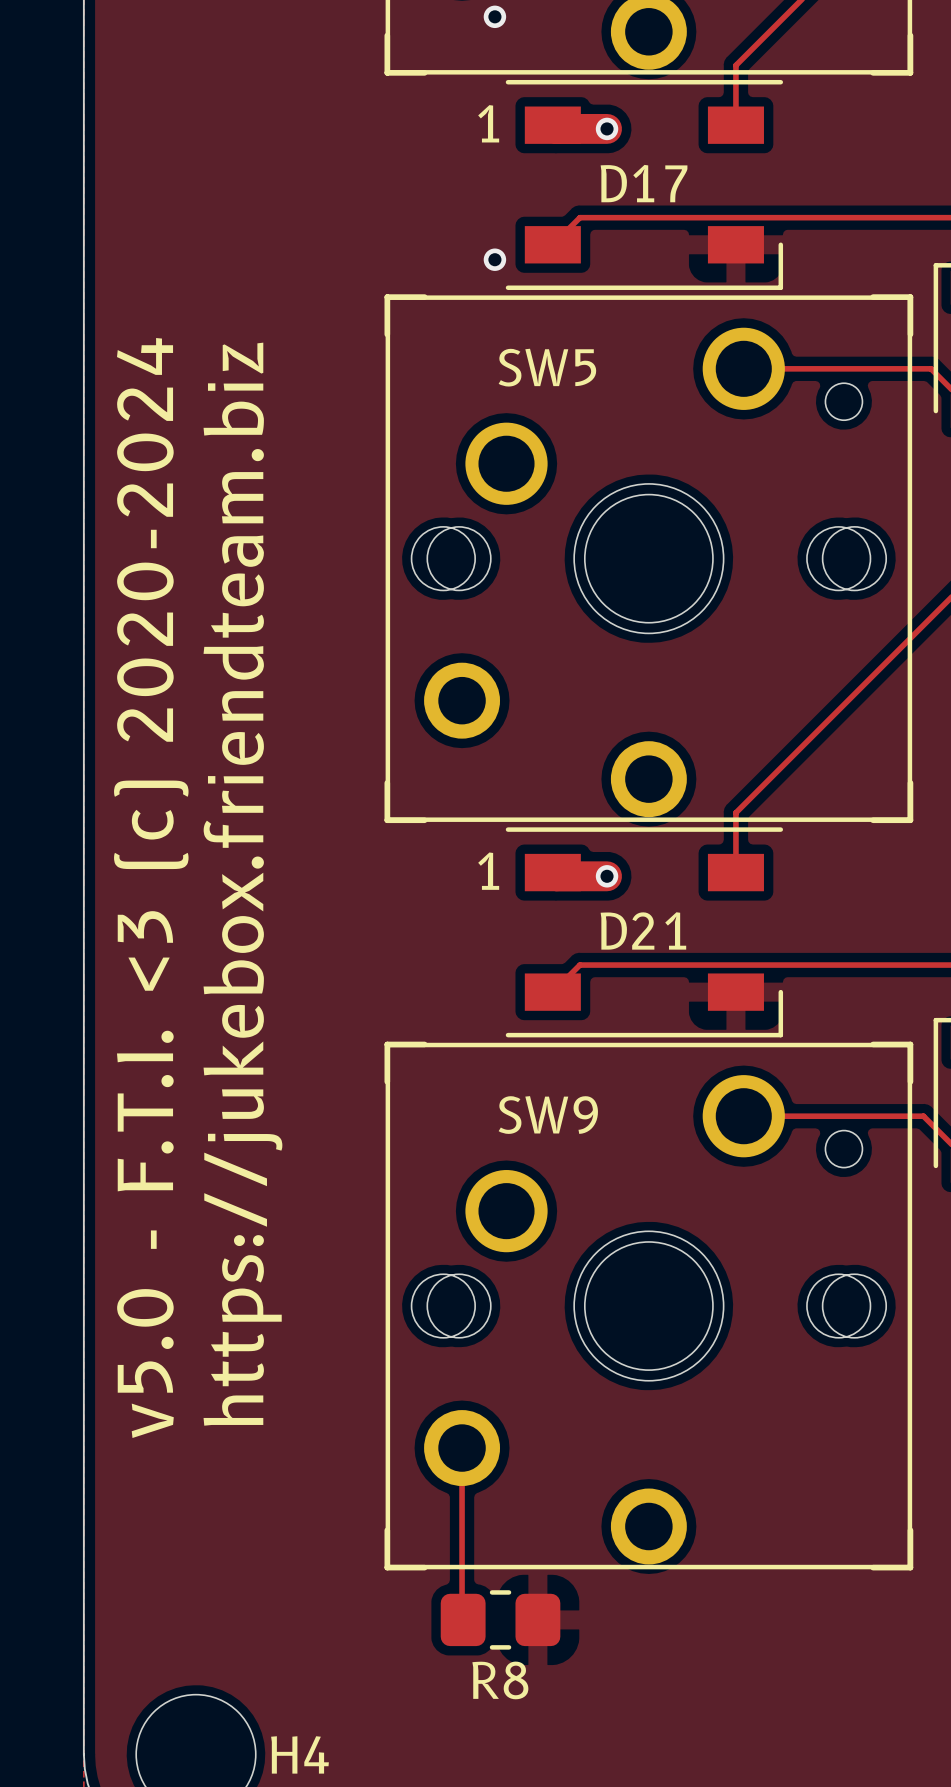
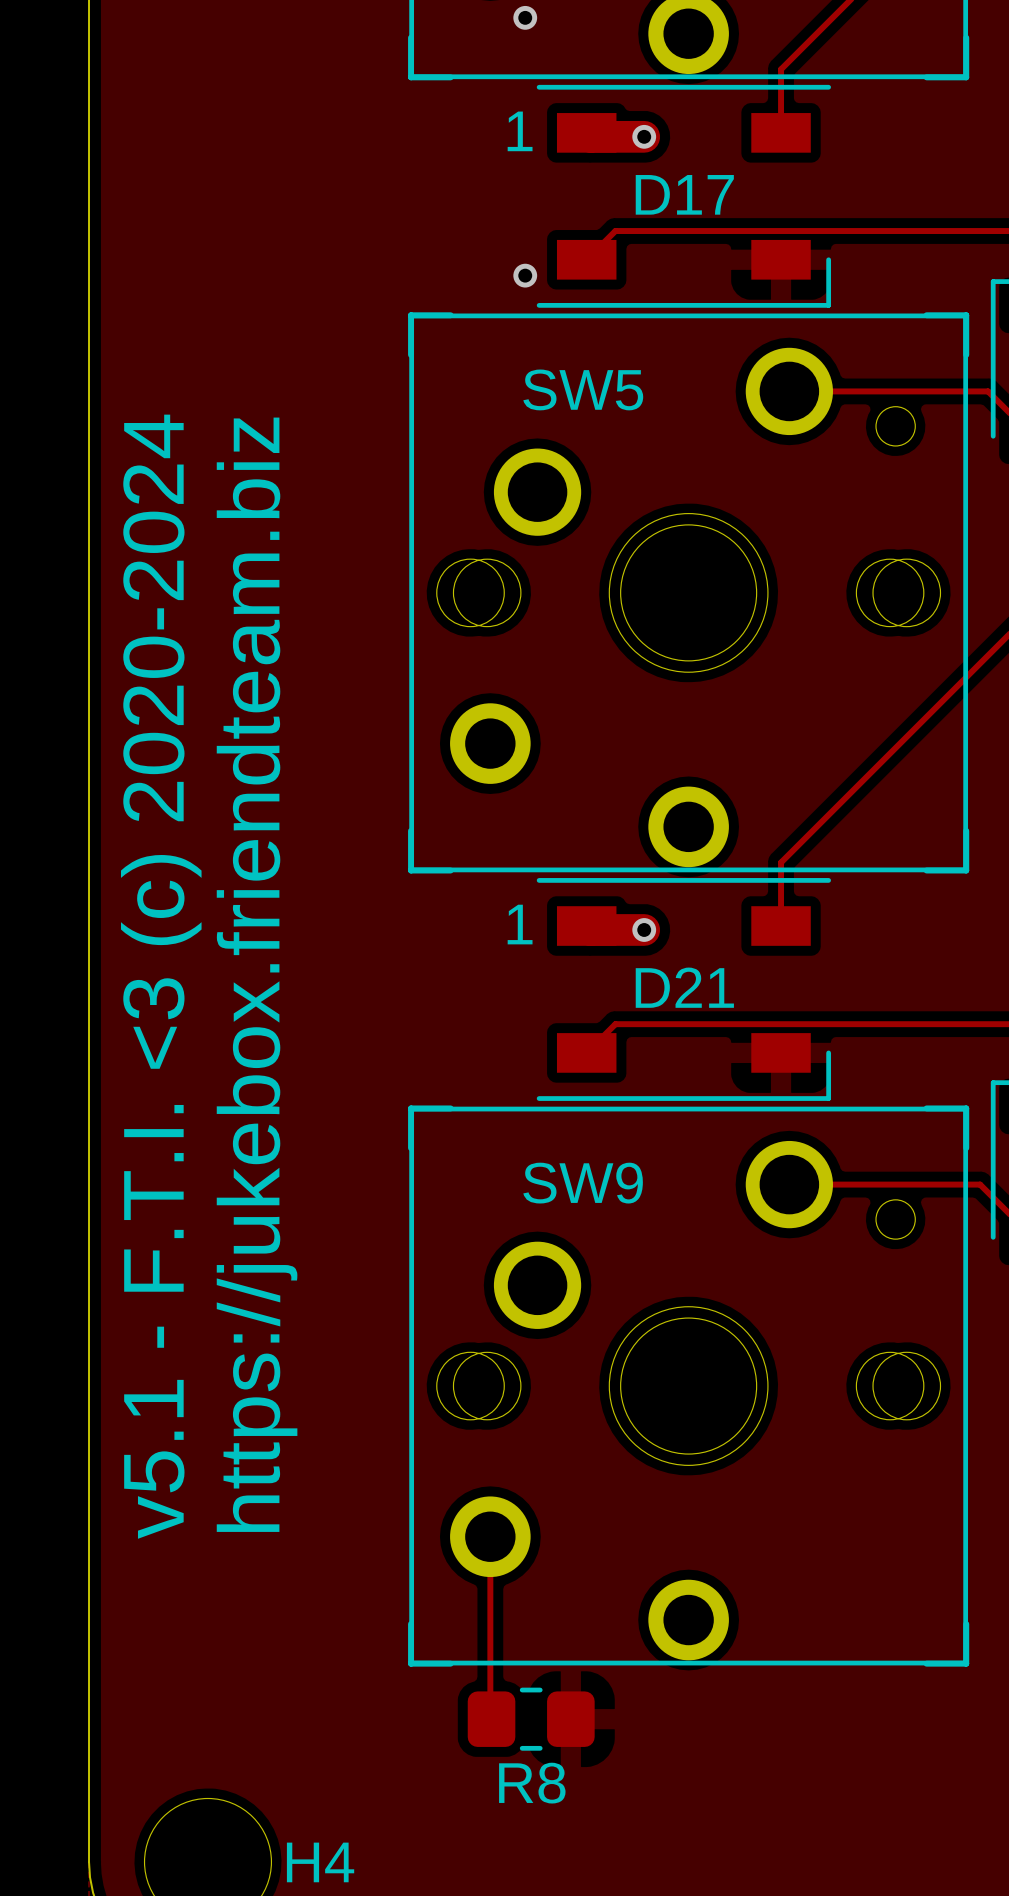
text position: https://jukebox.friendteam.biz (242, 884) -> https://jukebox.friendteam.biz (257, 974)
text: v5.0 - F.T.I. <3 (c) 2020-2024 (151, 888) -> v5.1 - F.T.I. <3 (c) 2020-2024 (161, 976)

